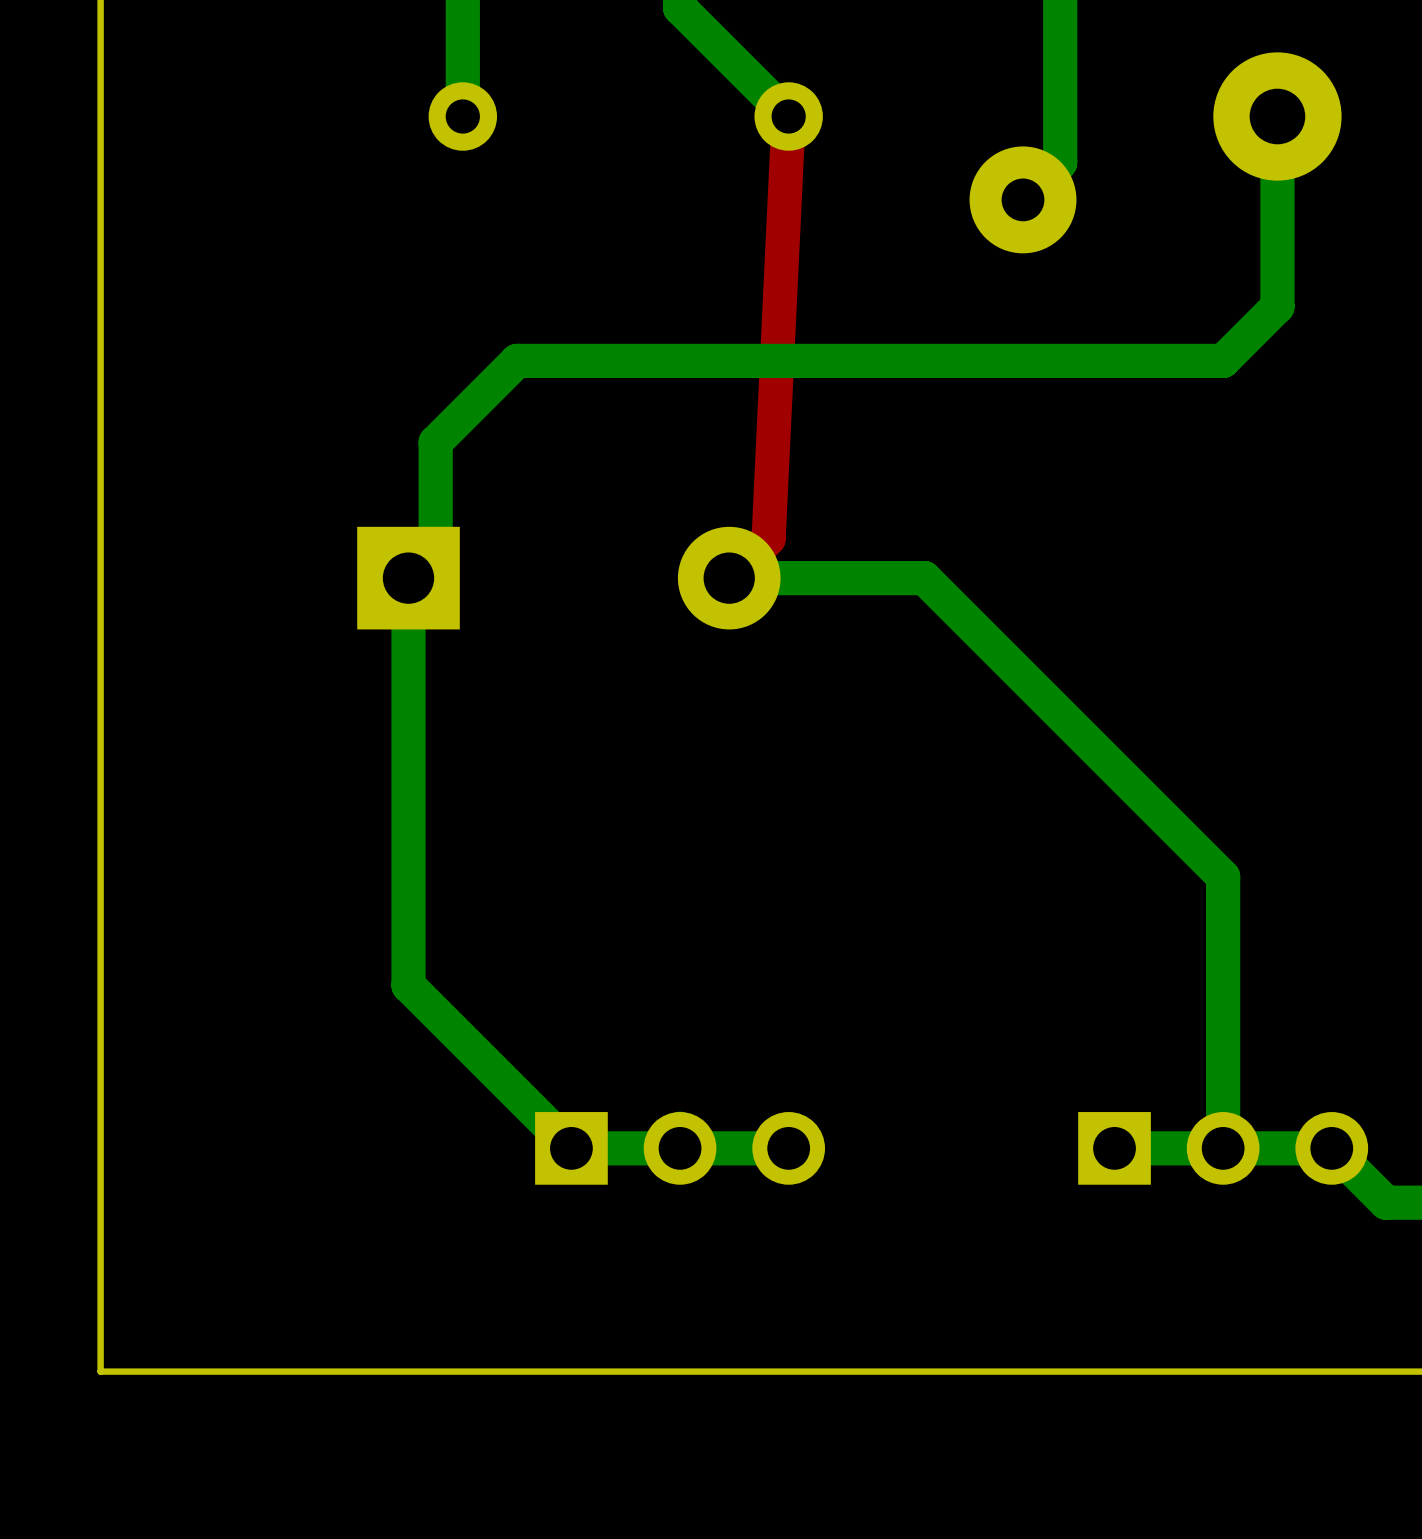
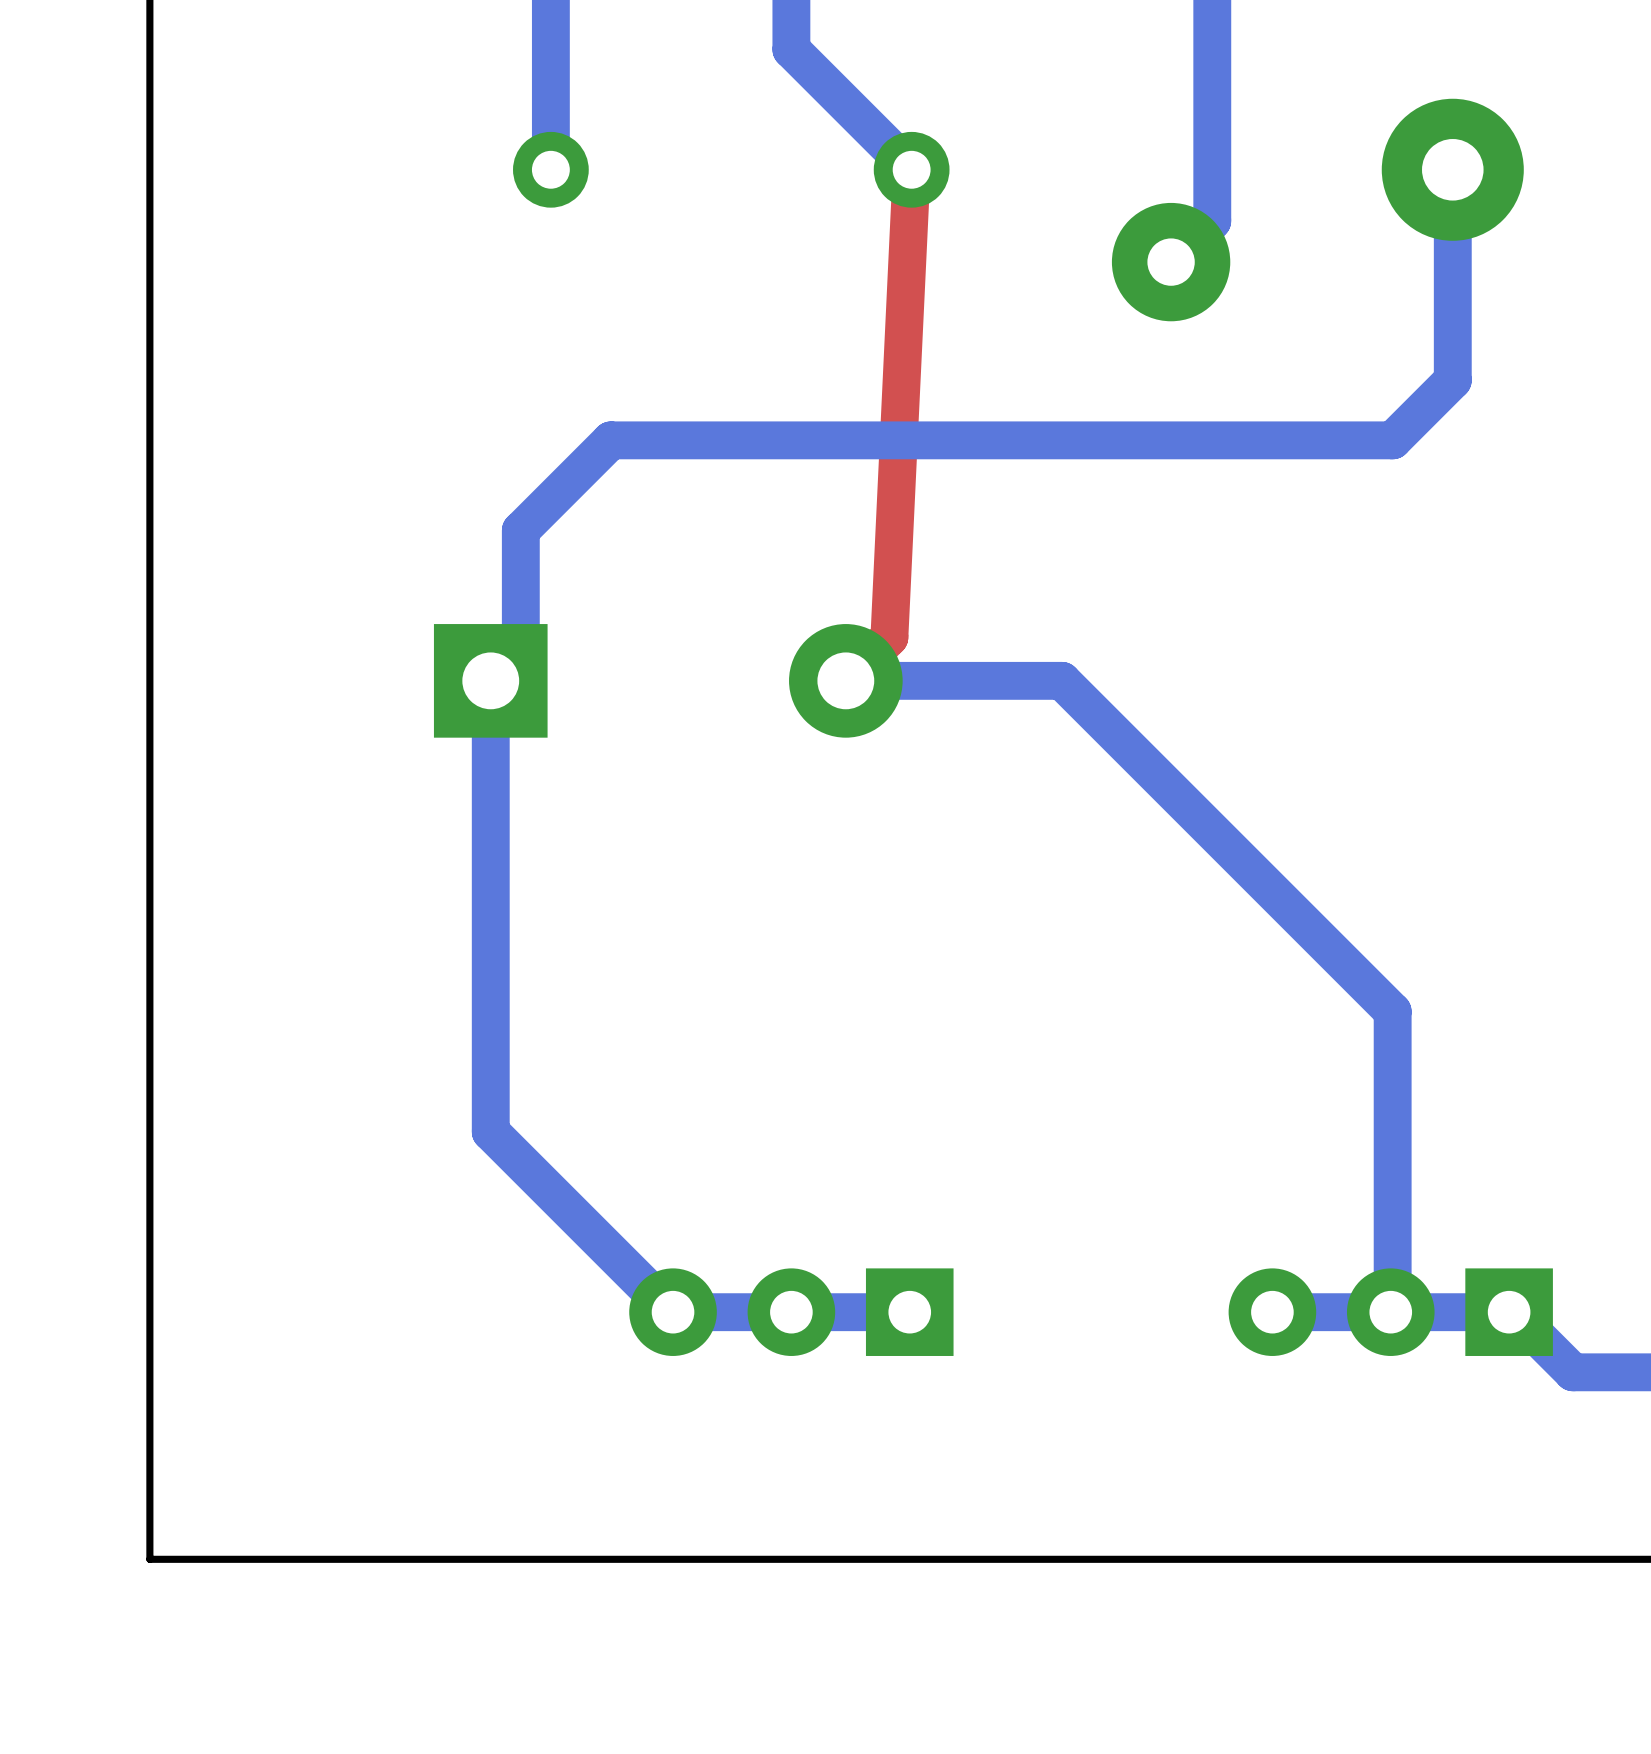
part footprint: [535, 1112, 826, 1185] -> [629, 1268, 954, 1356]
part footprint: [1078, 1112, 1369, 1185] -> [1228, 1268, 1553, 1356]

